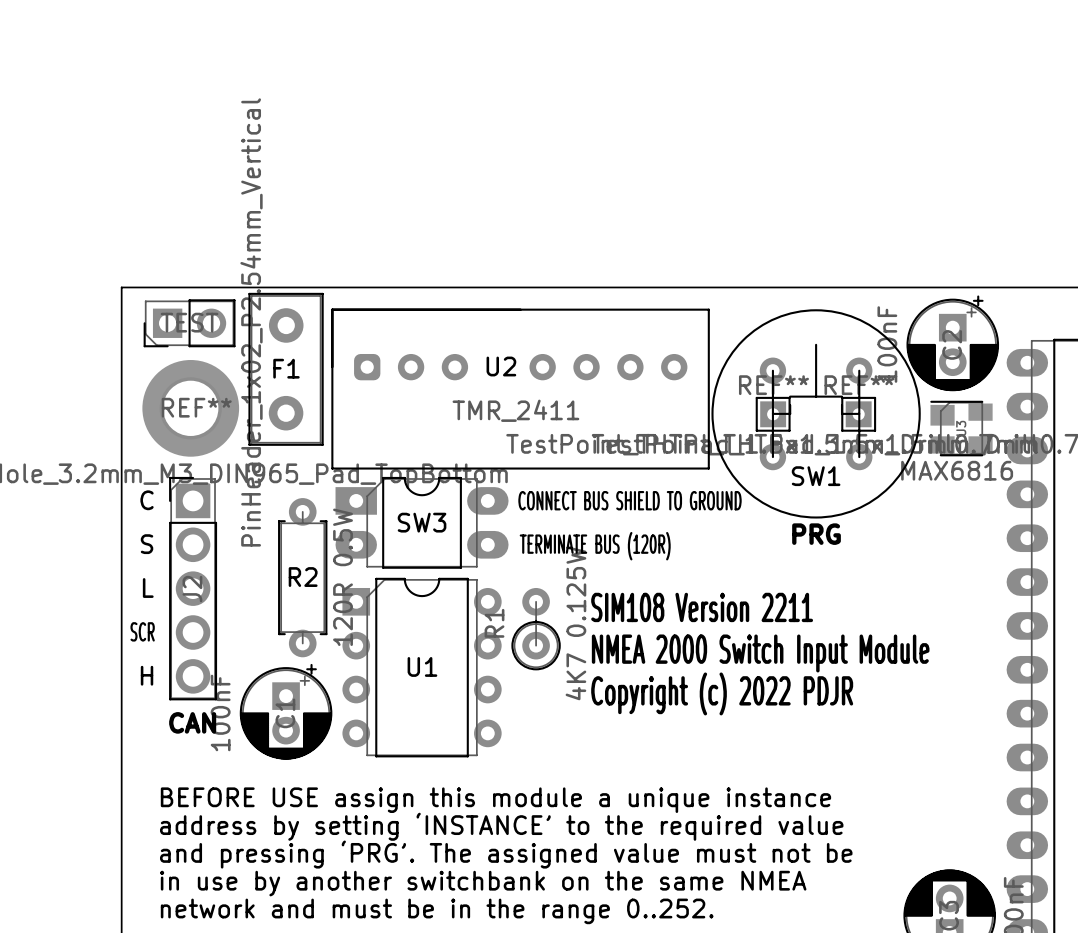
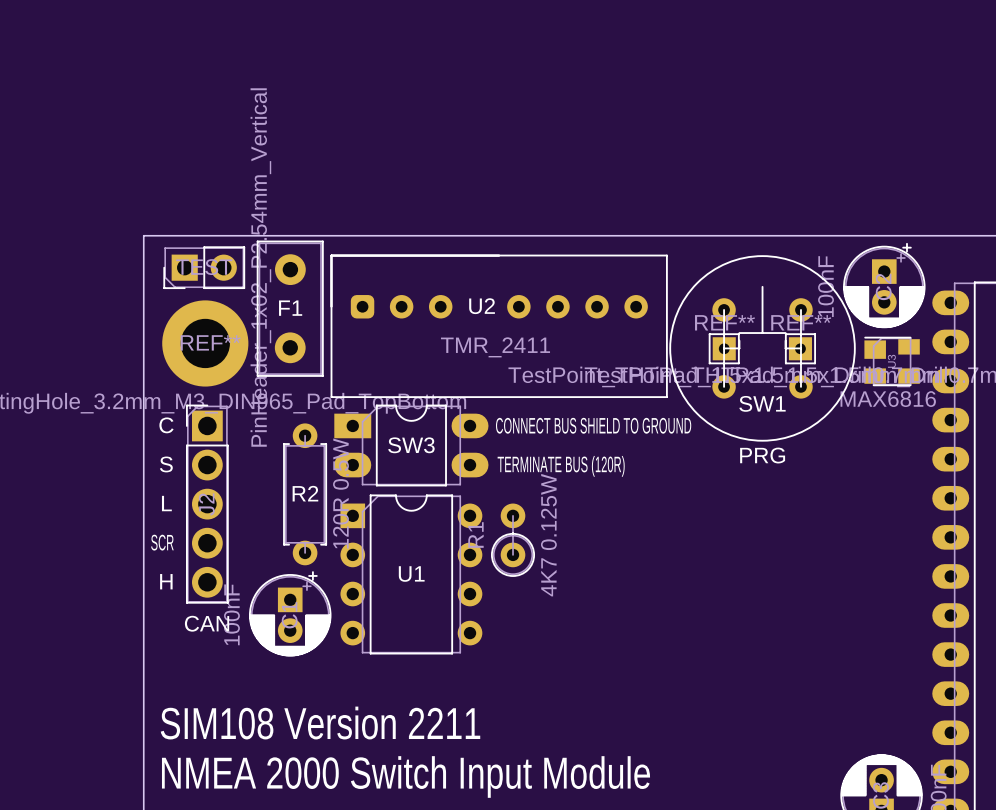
text: SIM108 Version 2211 (702, 607) -> none
text: NMEA 2000 Switch Input Module (760, 653) -> none
text: Copyright (c) 2022 PDJR (722, 693) -> none
text: BEFORE USE assign this module a unique instance (495, 800) -> none
text: address by setting ‘INSTANCE’ to the required value (501, 826) -> none
text: none -> SIM108 Version 2211 (320, 723)
text: and pressing ‘PRG’. The assigned value must not be (506, 854) -> none
text: in use by another switchbank on the same NMEA (483, 883) -> none
text: none -> NMEA 2000 Switch Input Module (406, 776)
text: network and must be in the range 0..252. (437, 911) -> none

